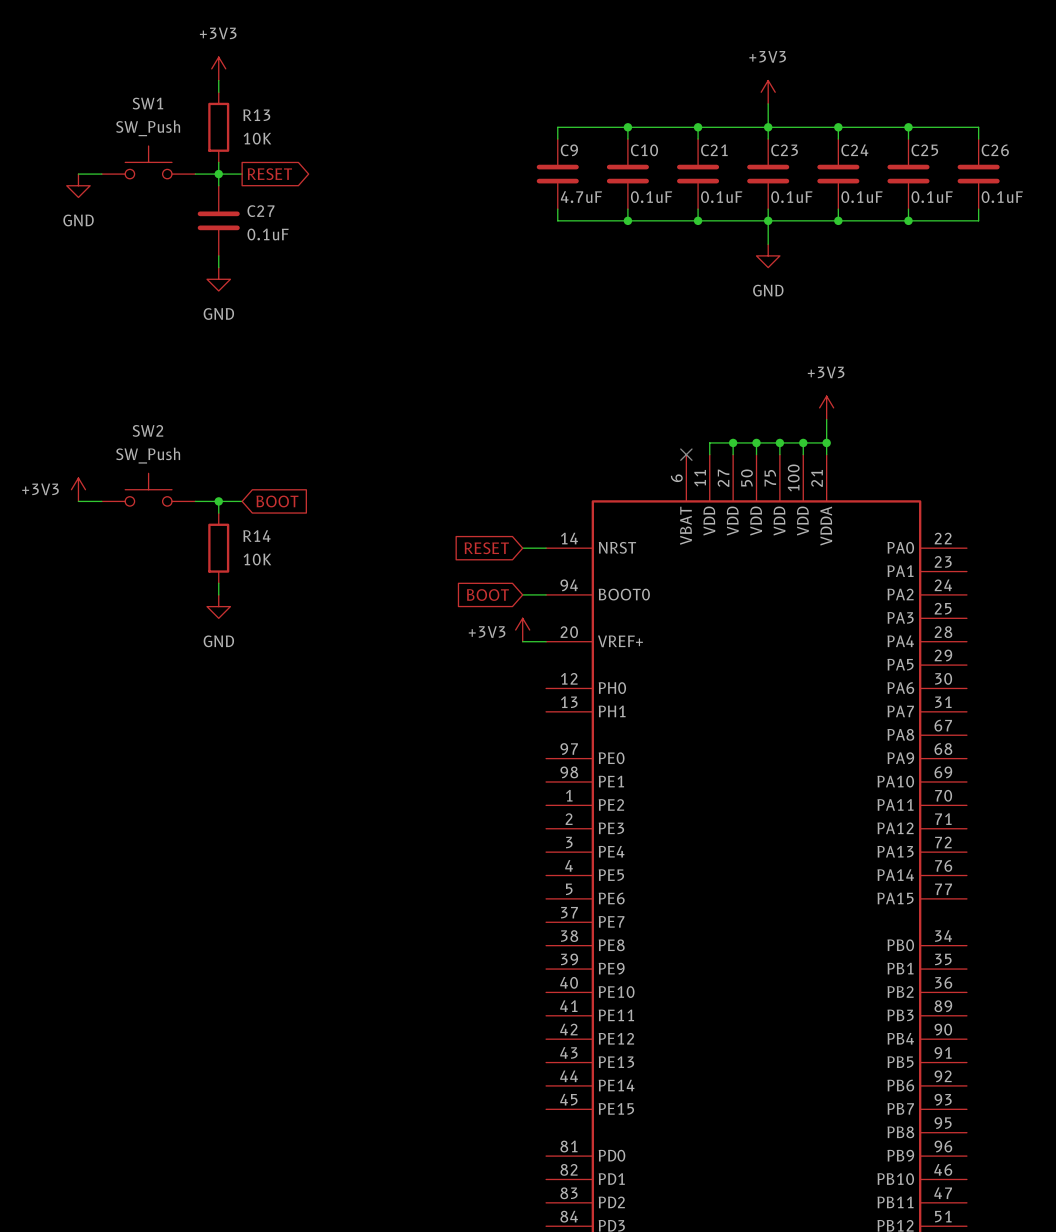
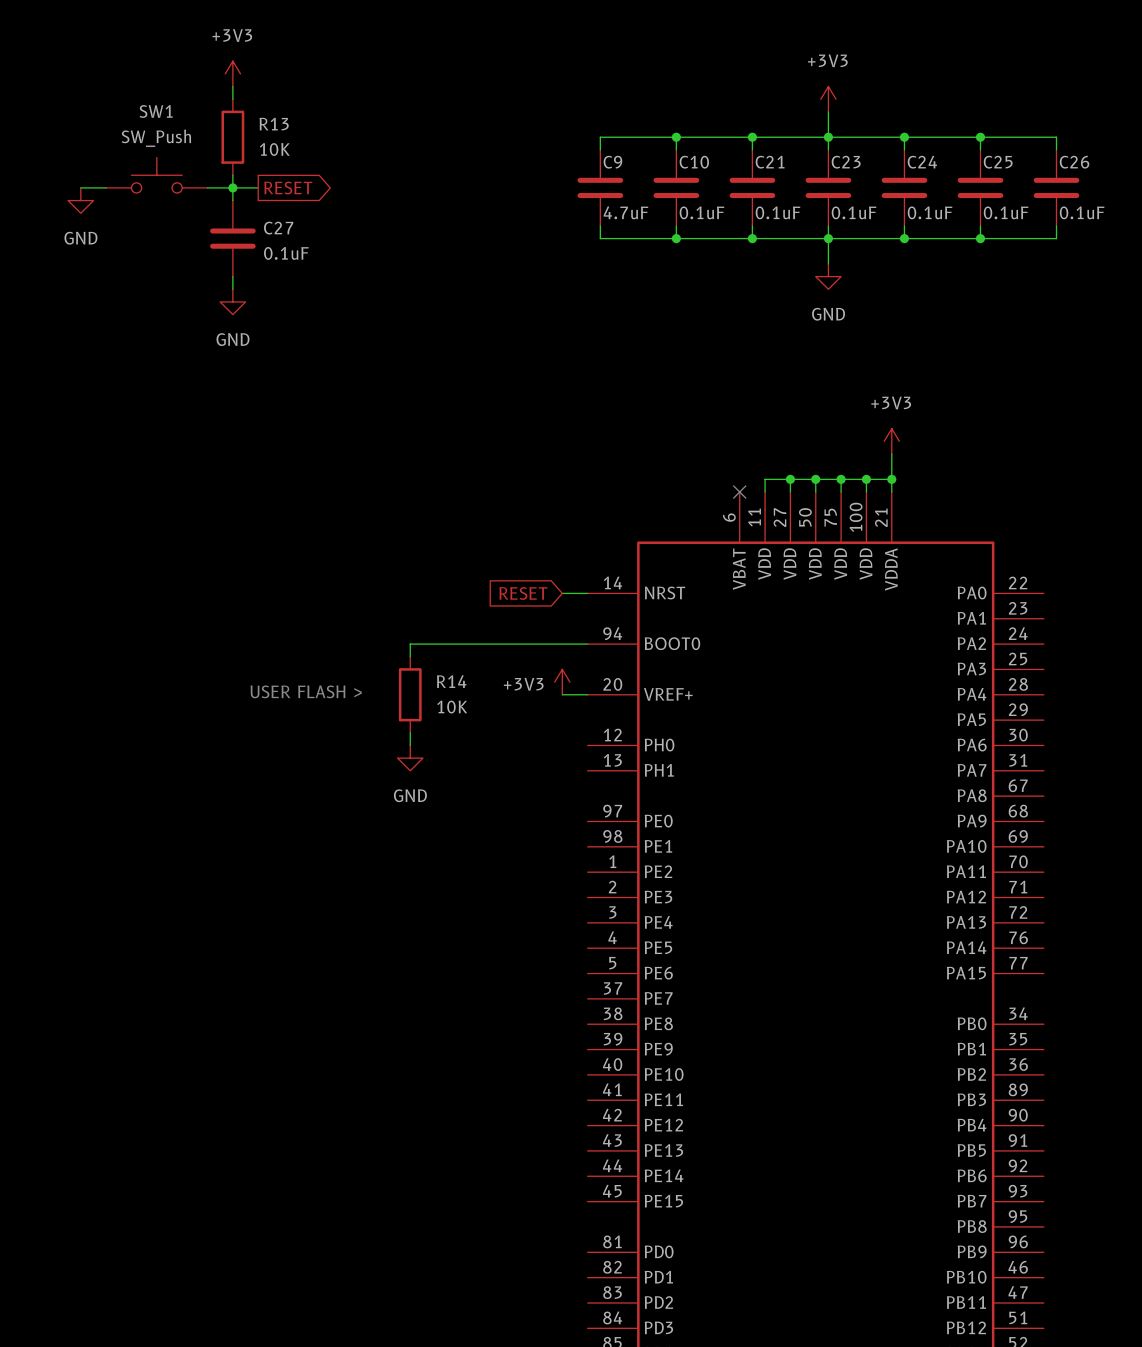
power symbol: +3V3 (78, 489) -> none
SW2: SW_Push (148, 489) -> none
wire: (78, 501) (101, 501) -> none
wire: (195, 501) (242, 501) -> none
wire: (218, 501) (218, 513) -> none
junction: (218, 501) -> none
global label: BOOT (277, 501) -> none
R14 position: (218, 548) -> (410, 694)
wire: (218, 583) (218, 594) -> (410, 732) (410, 745)
wire: none -> (562, 644) (410, 644) (410, 656)
global label: BOOT (487, 595) -> none
power symbol position: GND (218, 606) -> GND (410, 758)
text: none -> USER FLASH > (306, 691)

